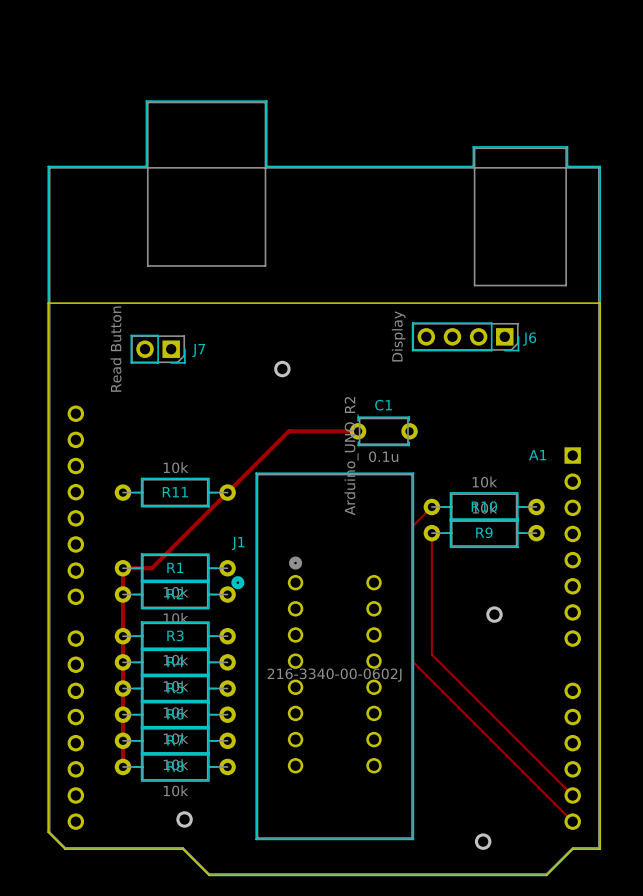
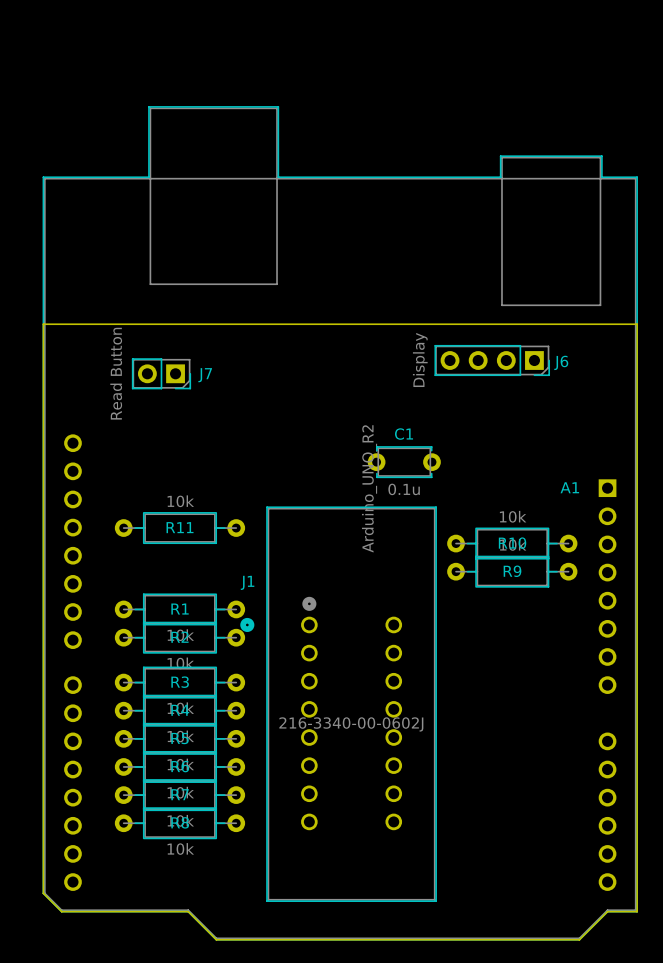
via: (282, 369) -> none
track: (358, 431) (288, 431) (151, 568) (122, 568) (122, 766) -> none
track: (431, 507) (413, 525) (413, 662) (572, 821) -> none
track: (431, 533) (431, 654) (572, 795) -> none
via: (494, 614) -> none
via: (184, 819) -> none
via: (483, 841) -> none

